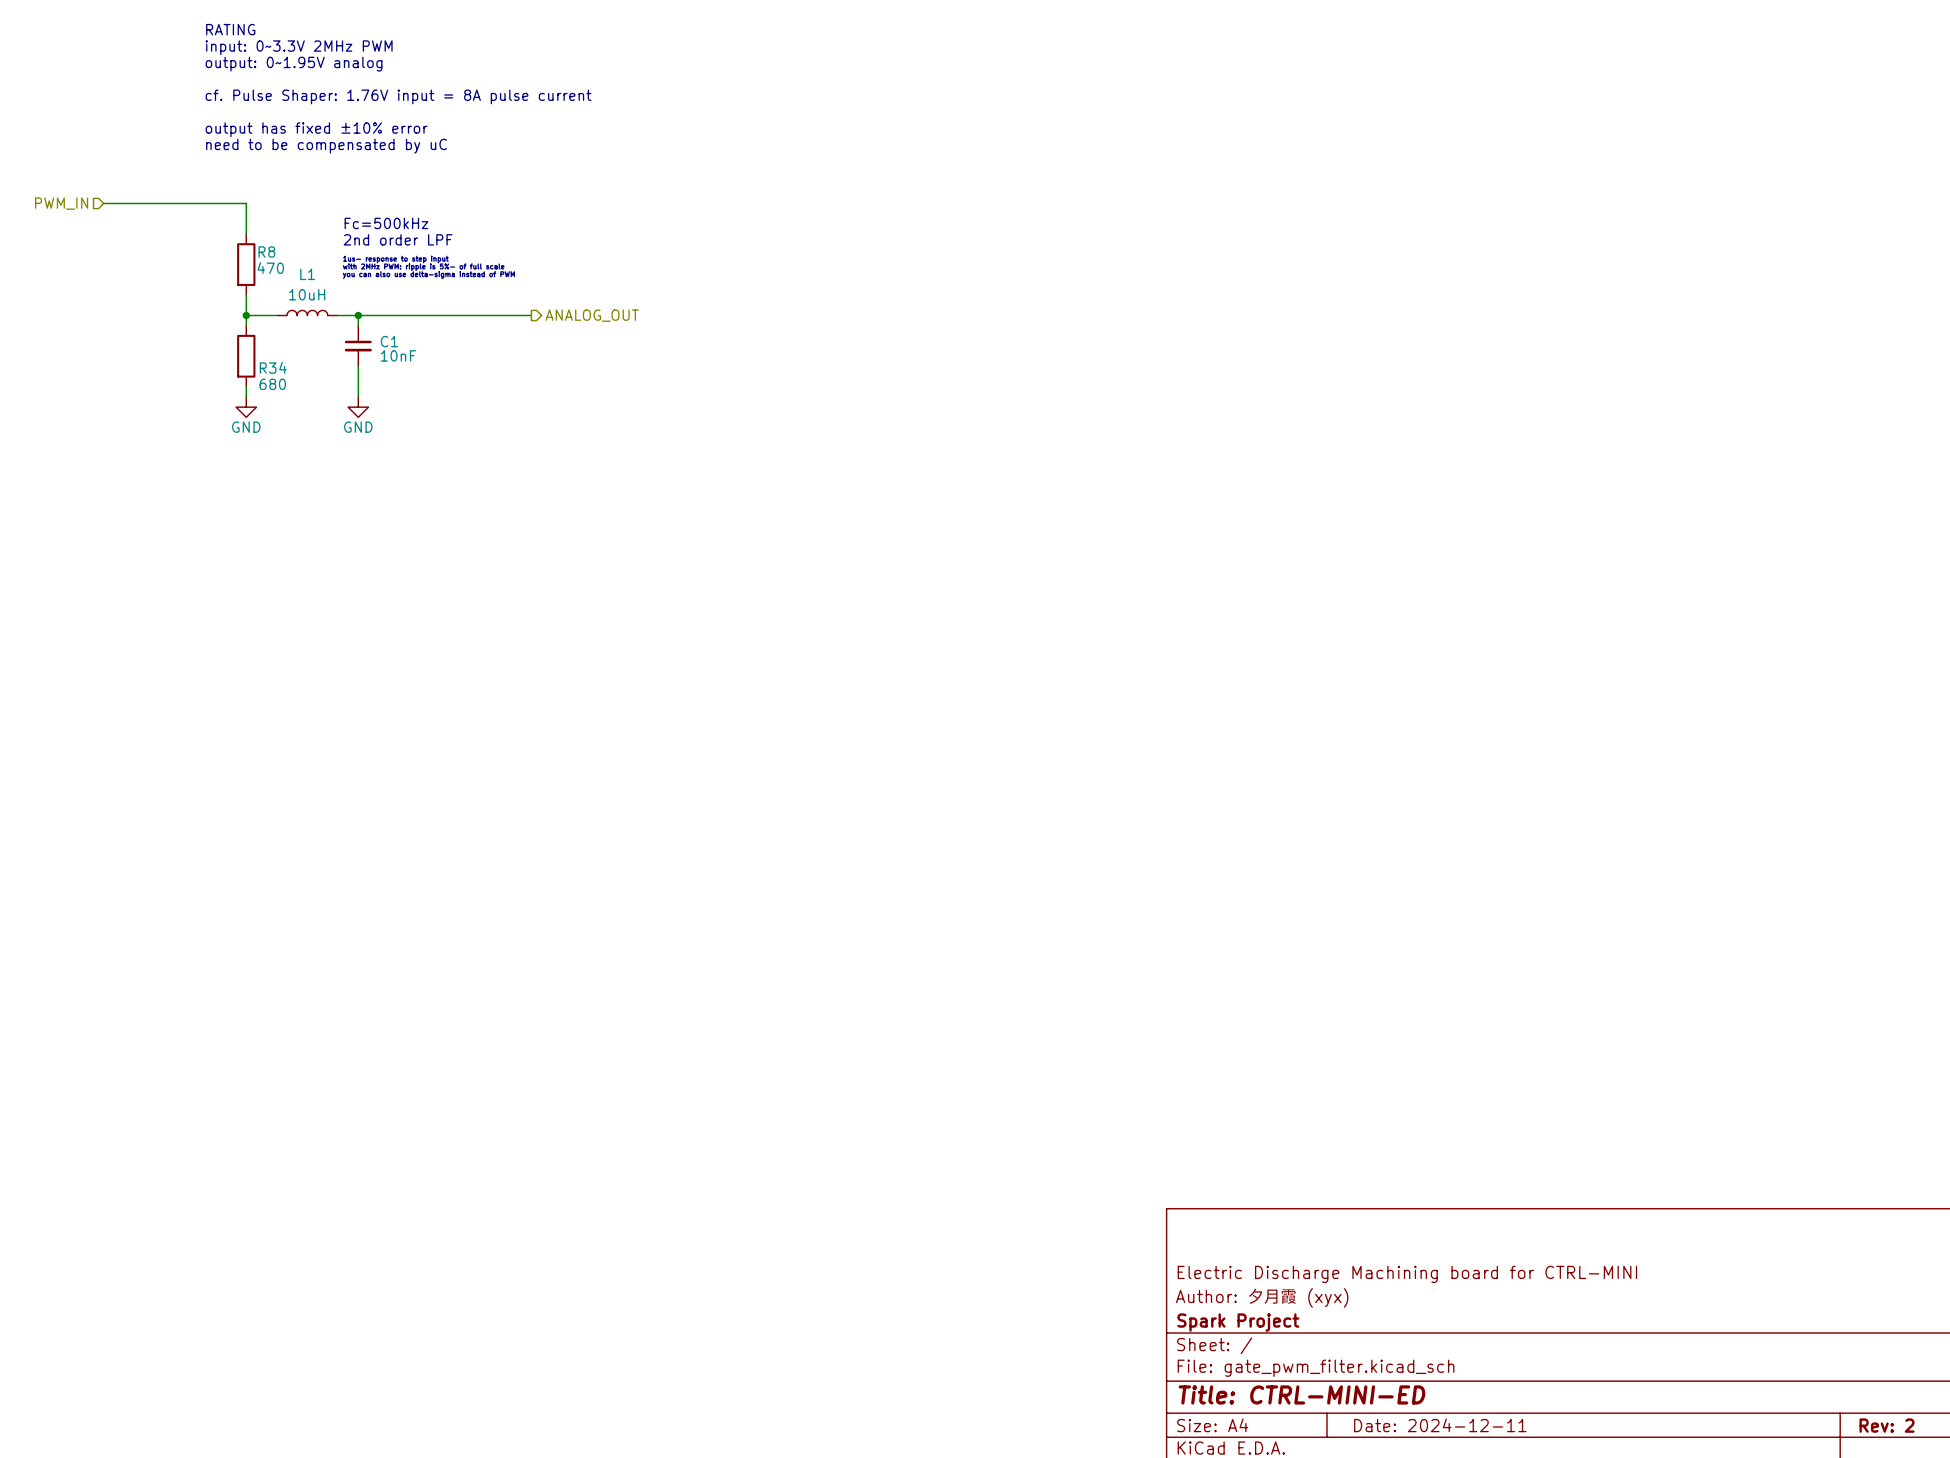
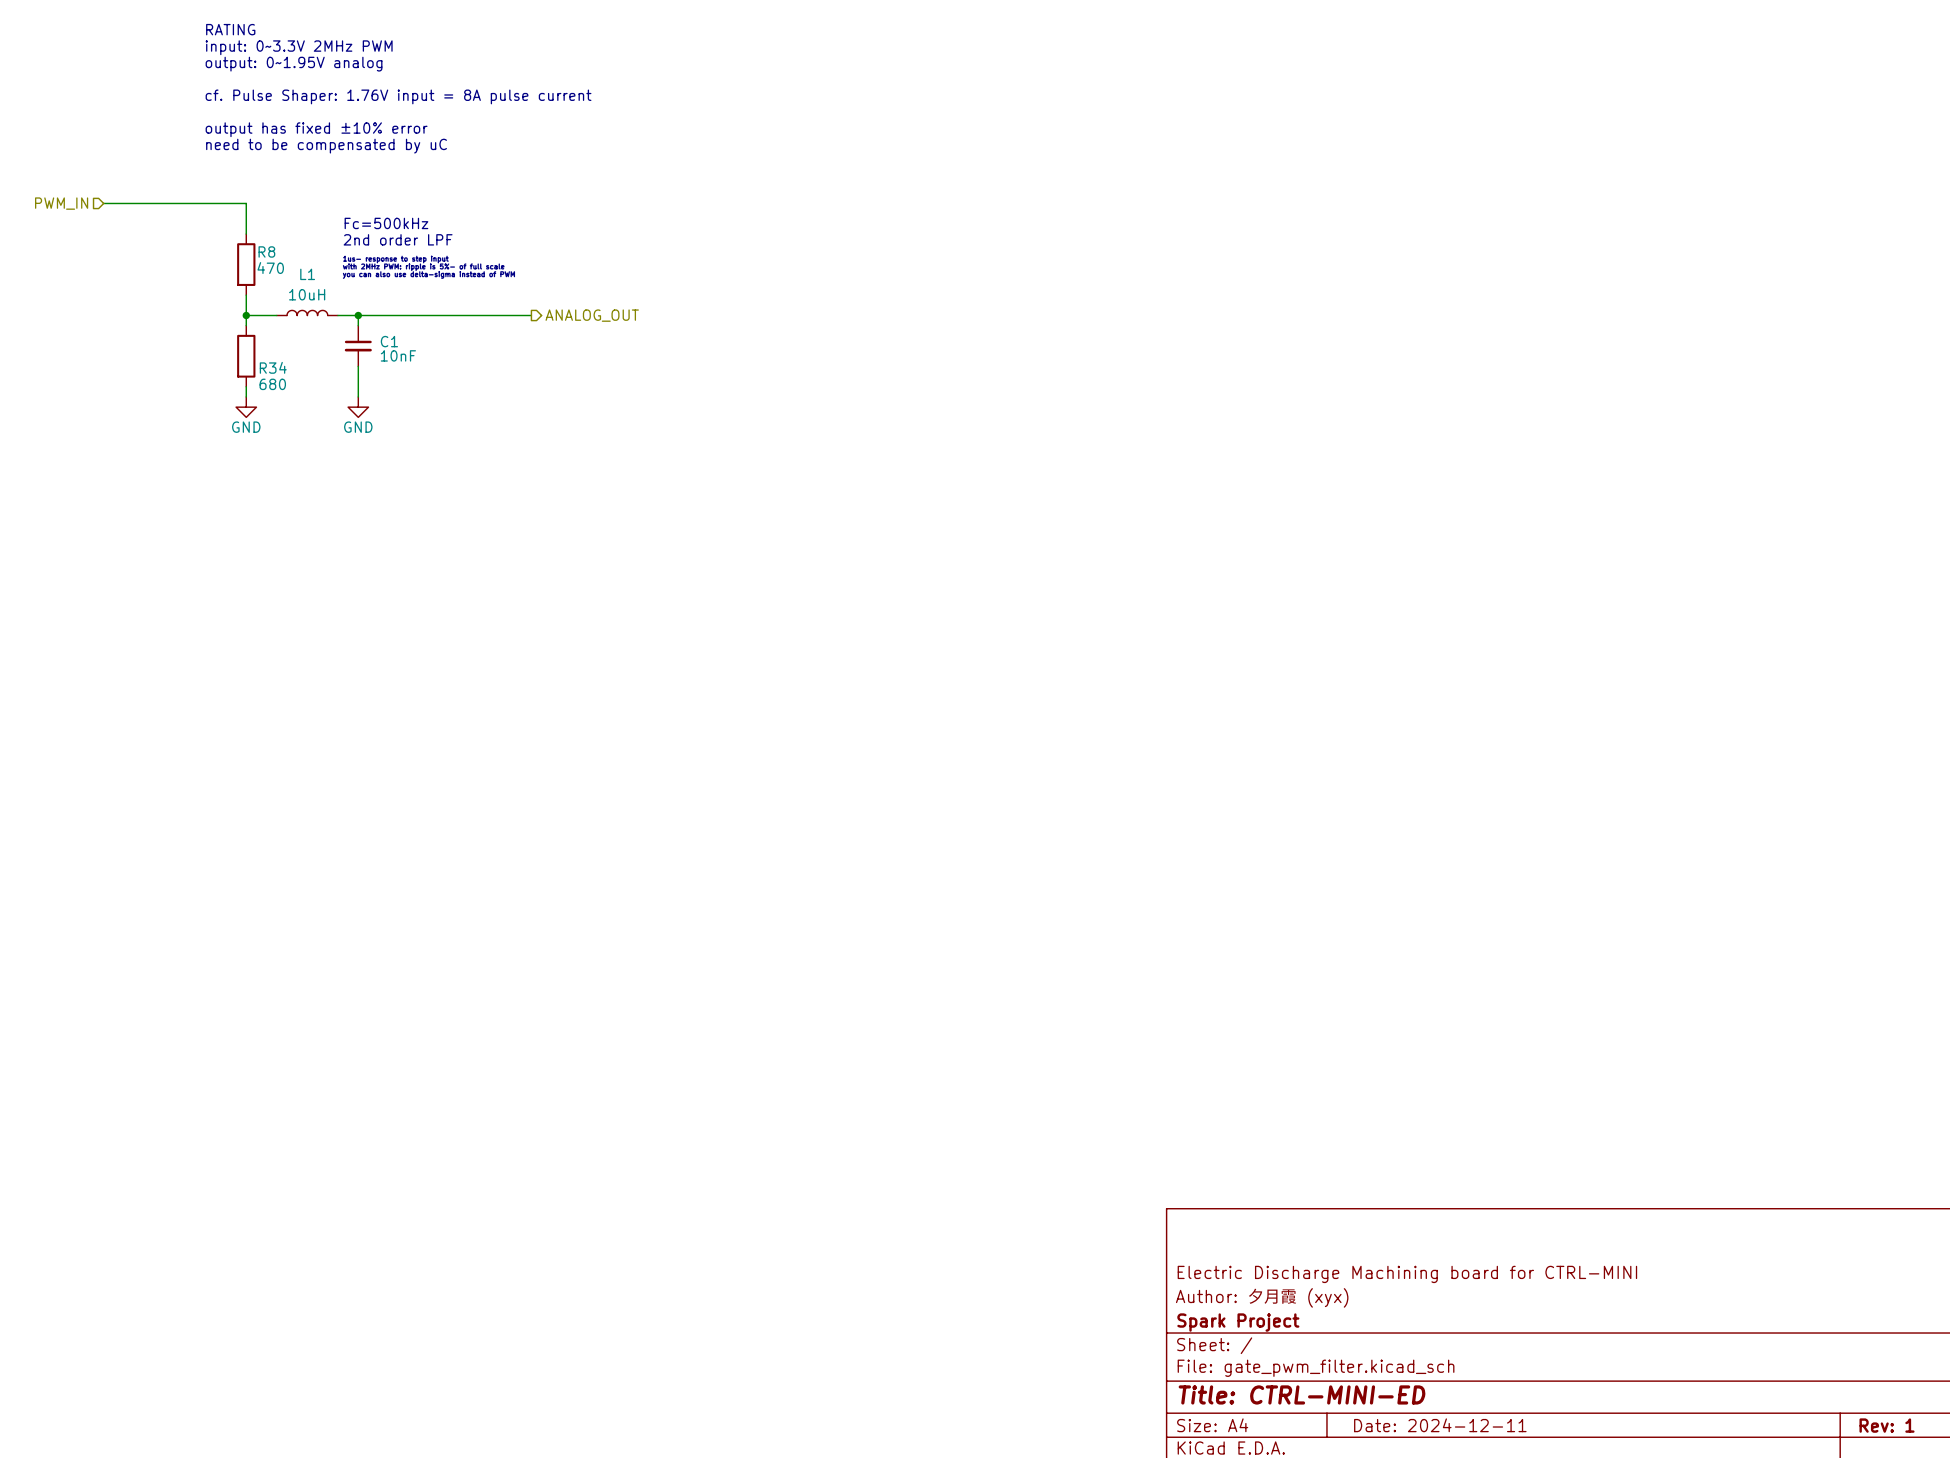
title block: Rev: 2 (1887, 1425) -> Rev: 1 (1887, 1425)

